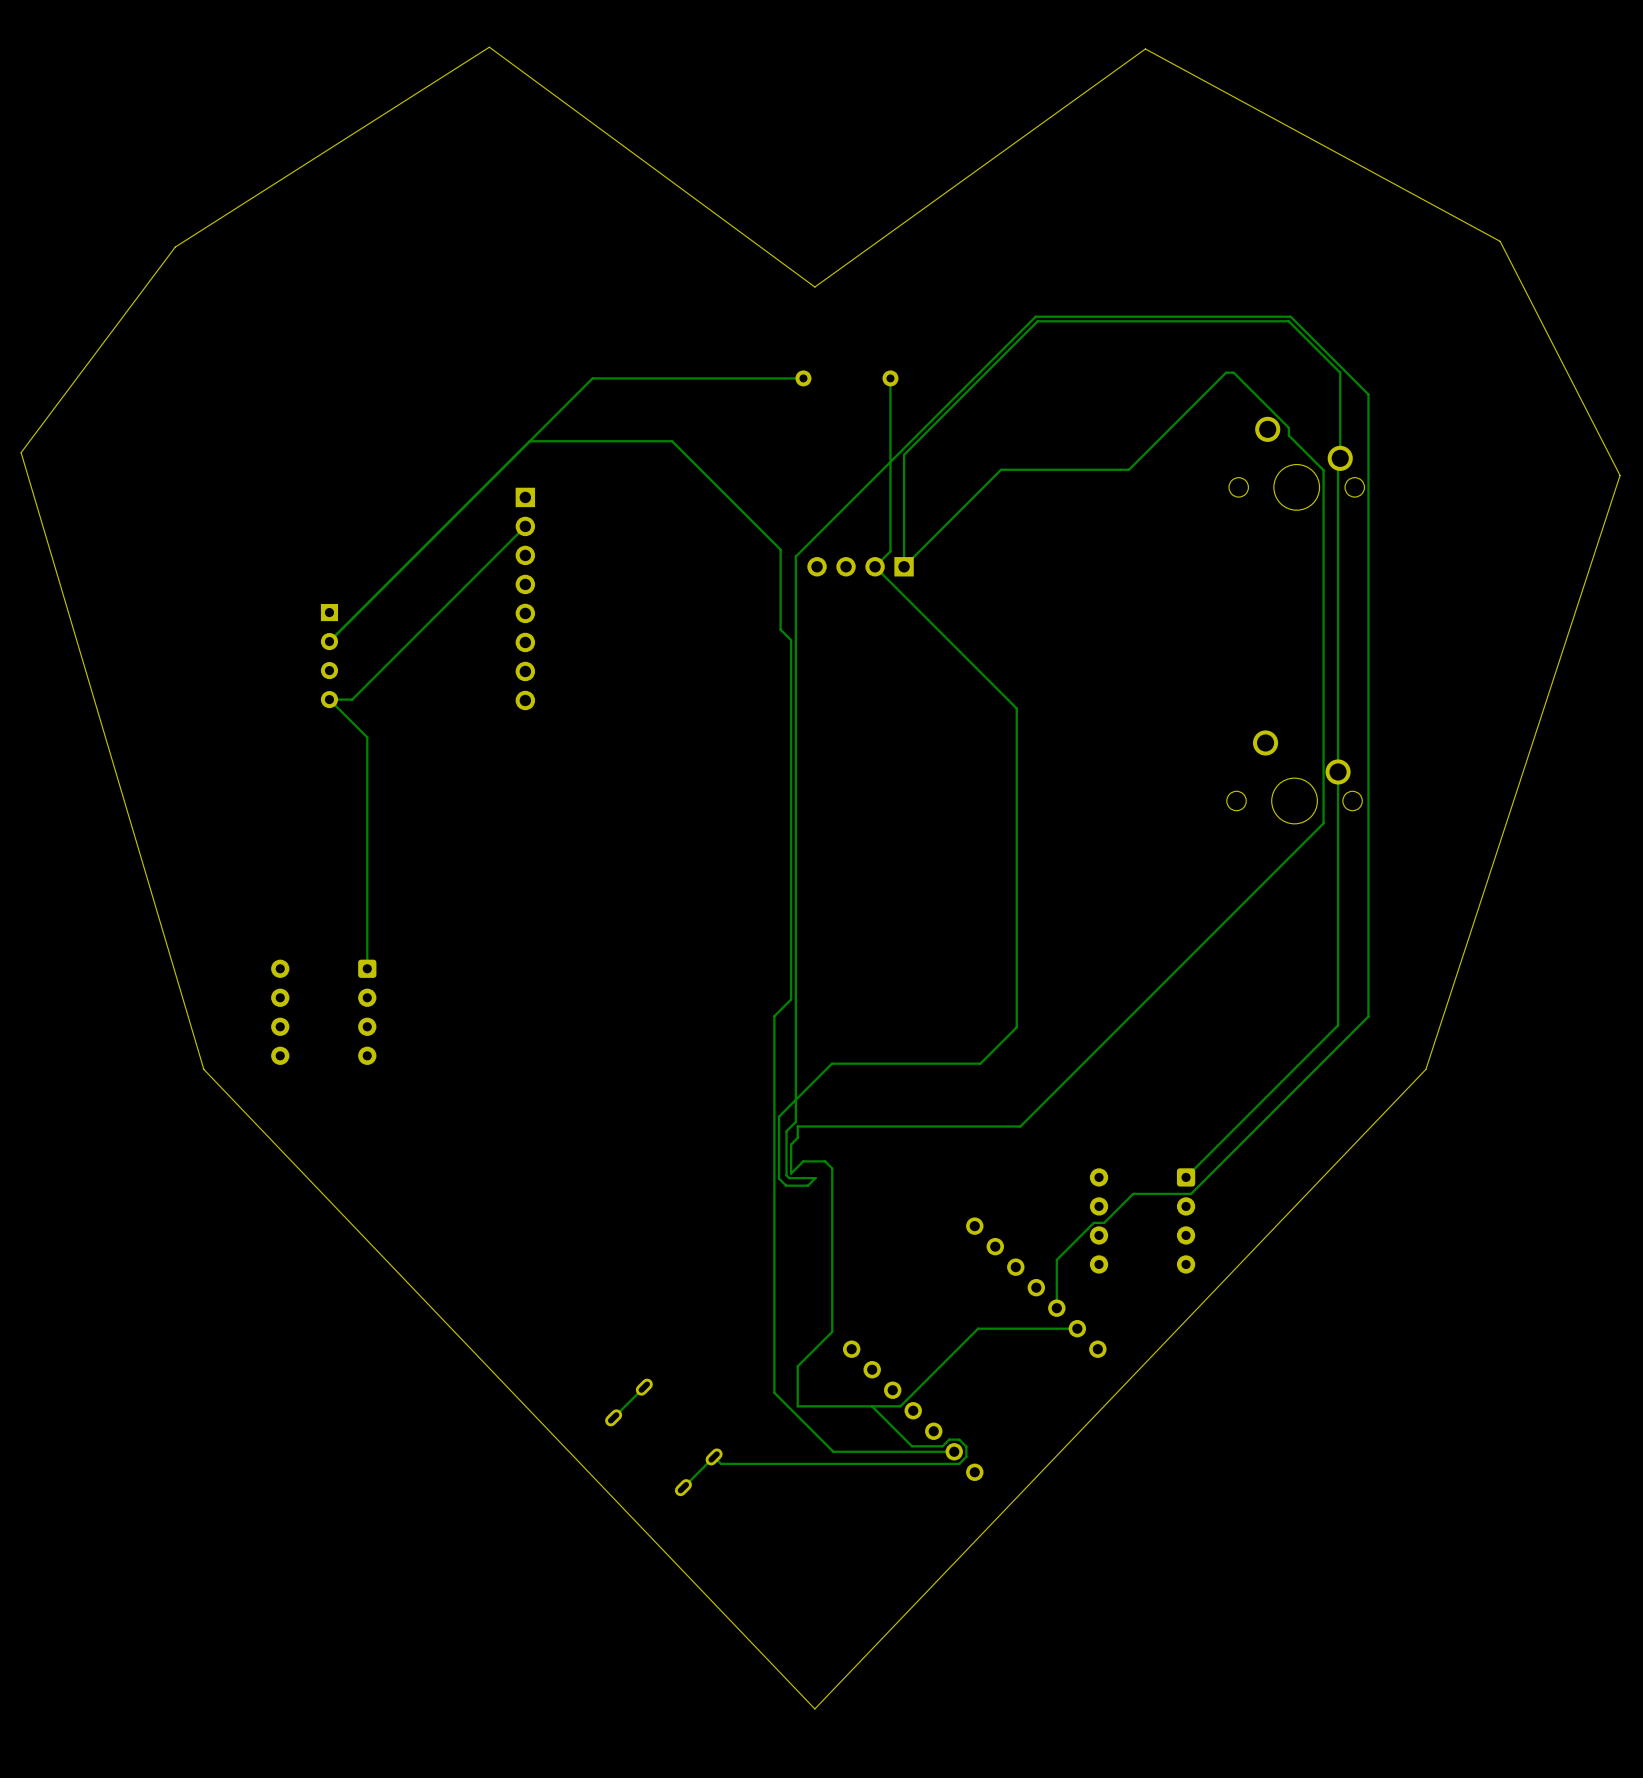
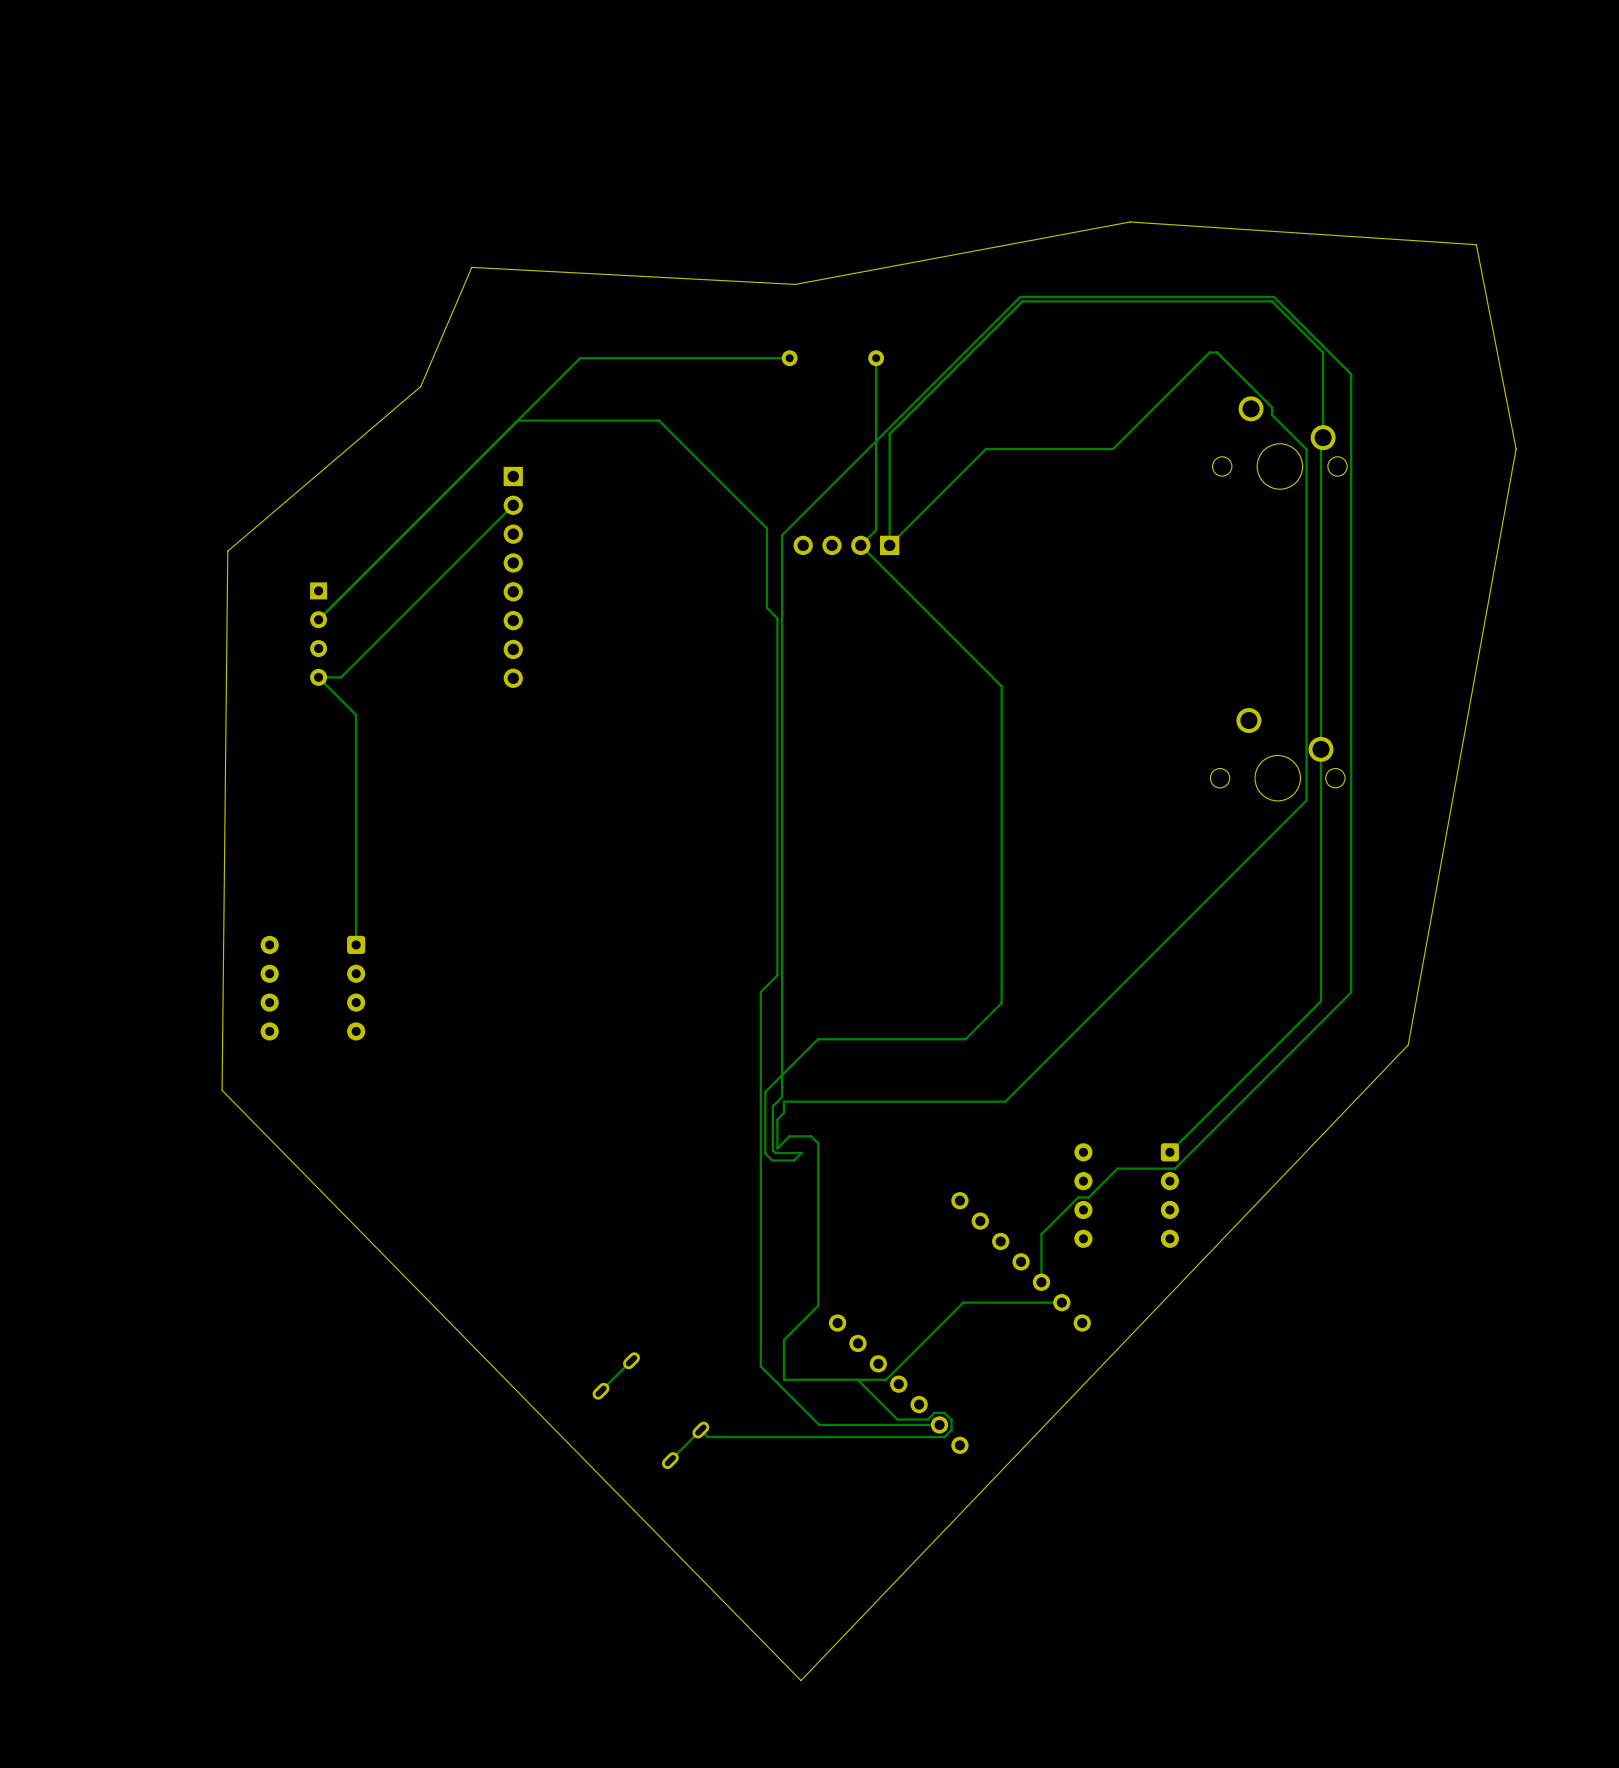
board edge: (1425, 1069) (1620, 475) (1500, 241) (1145, 48) (814, 287) (489, 47) (175, 247) (21, 452) (203, 1069) (814, 1708) -> (1408, 1044) (1516, 449) (1476, 244) (1130, 221) (795, 284) (471, 267) (420, 386) (227, 551) (222, 1090) (801, 1680)

